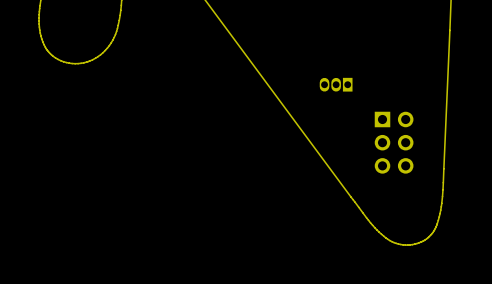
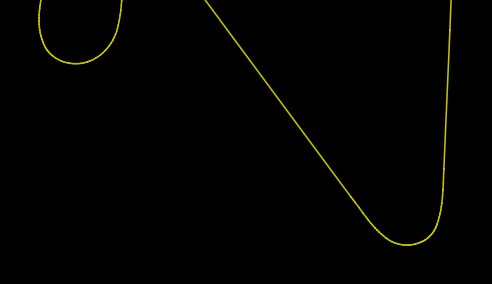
part: (336, 84) -> none
part: (394, 142) -> none

